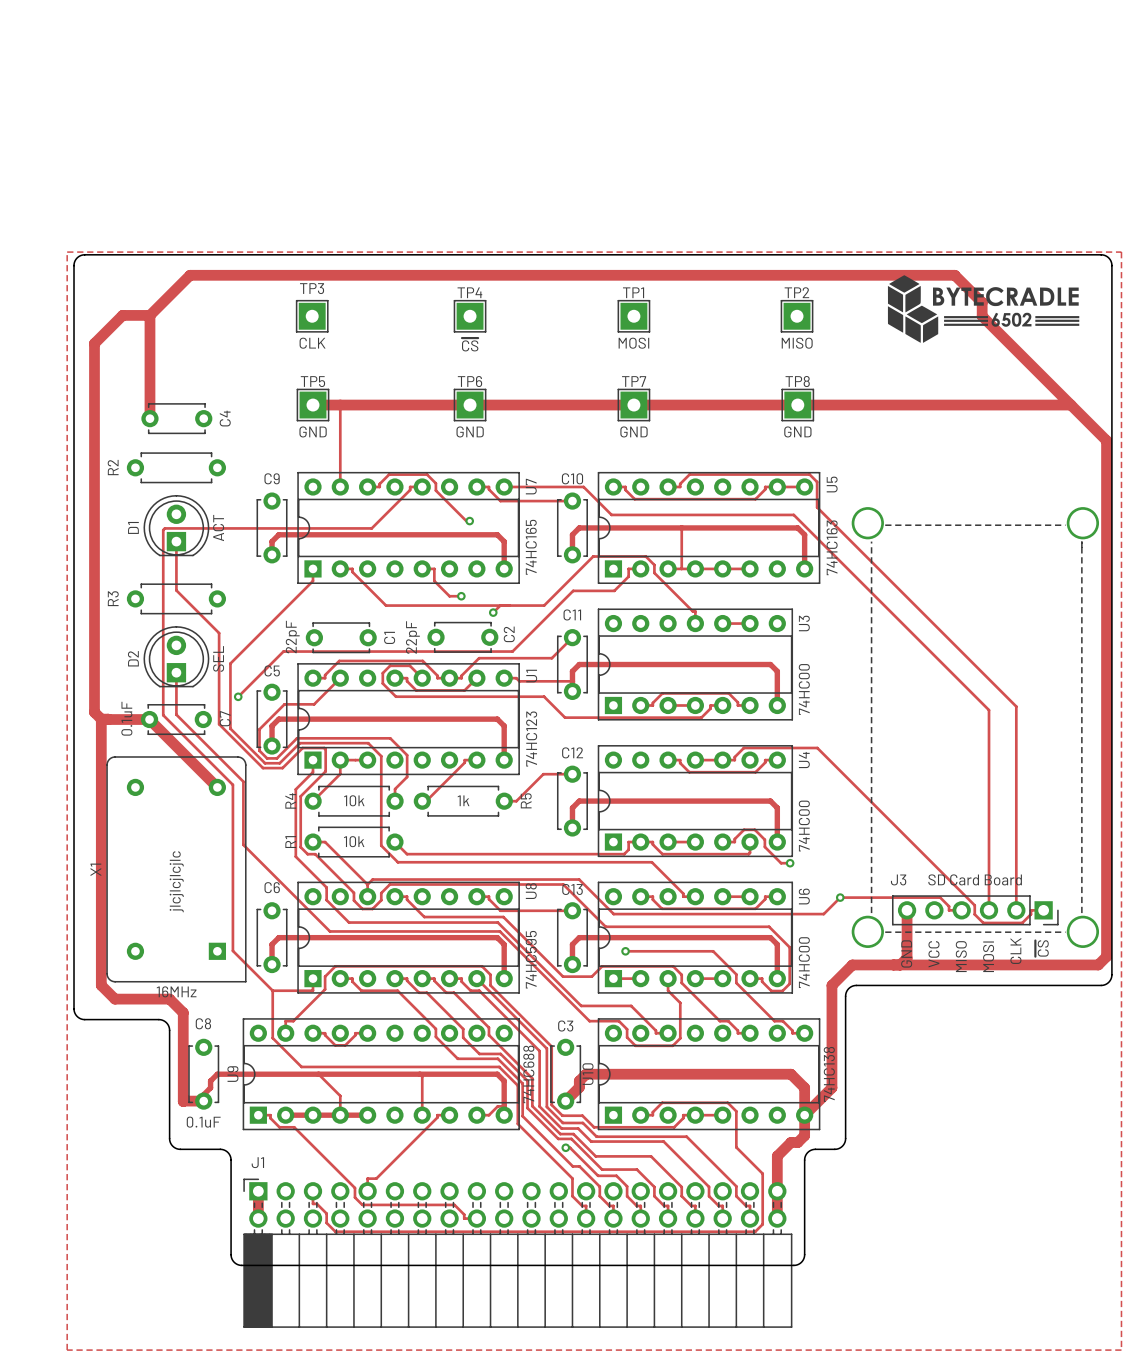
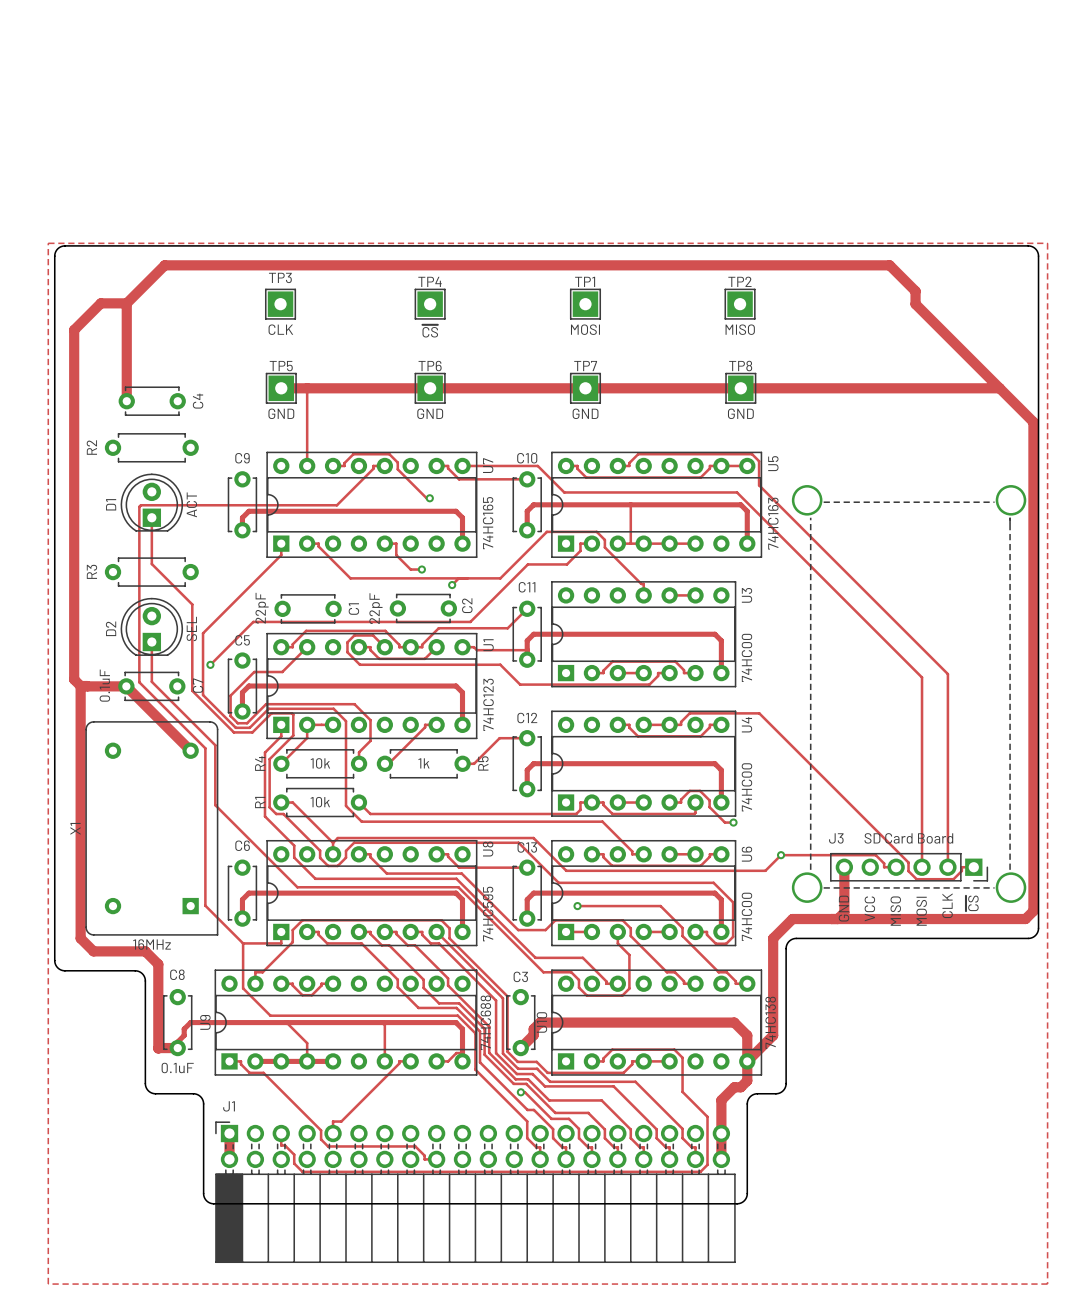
drawing: [887, 275, 1080, 343] -> none
text: jlcjlcjlcjlc (176, 881) -> none

